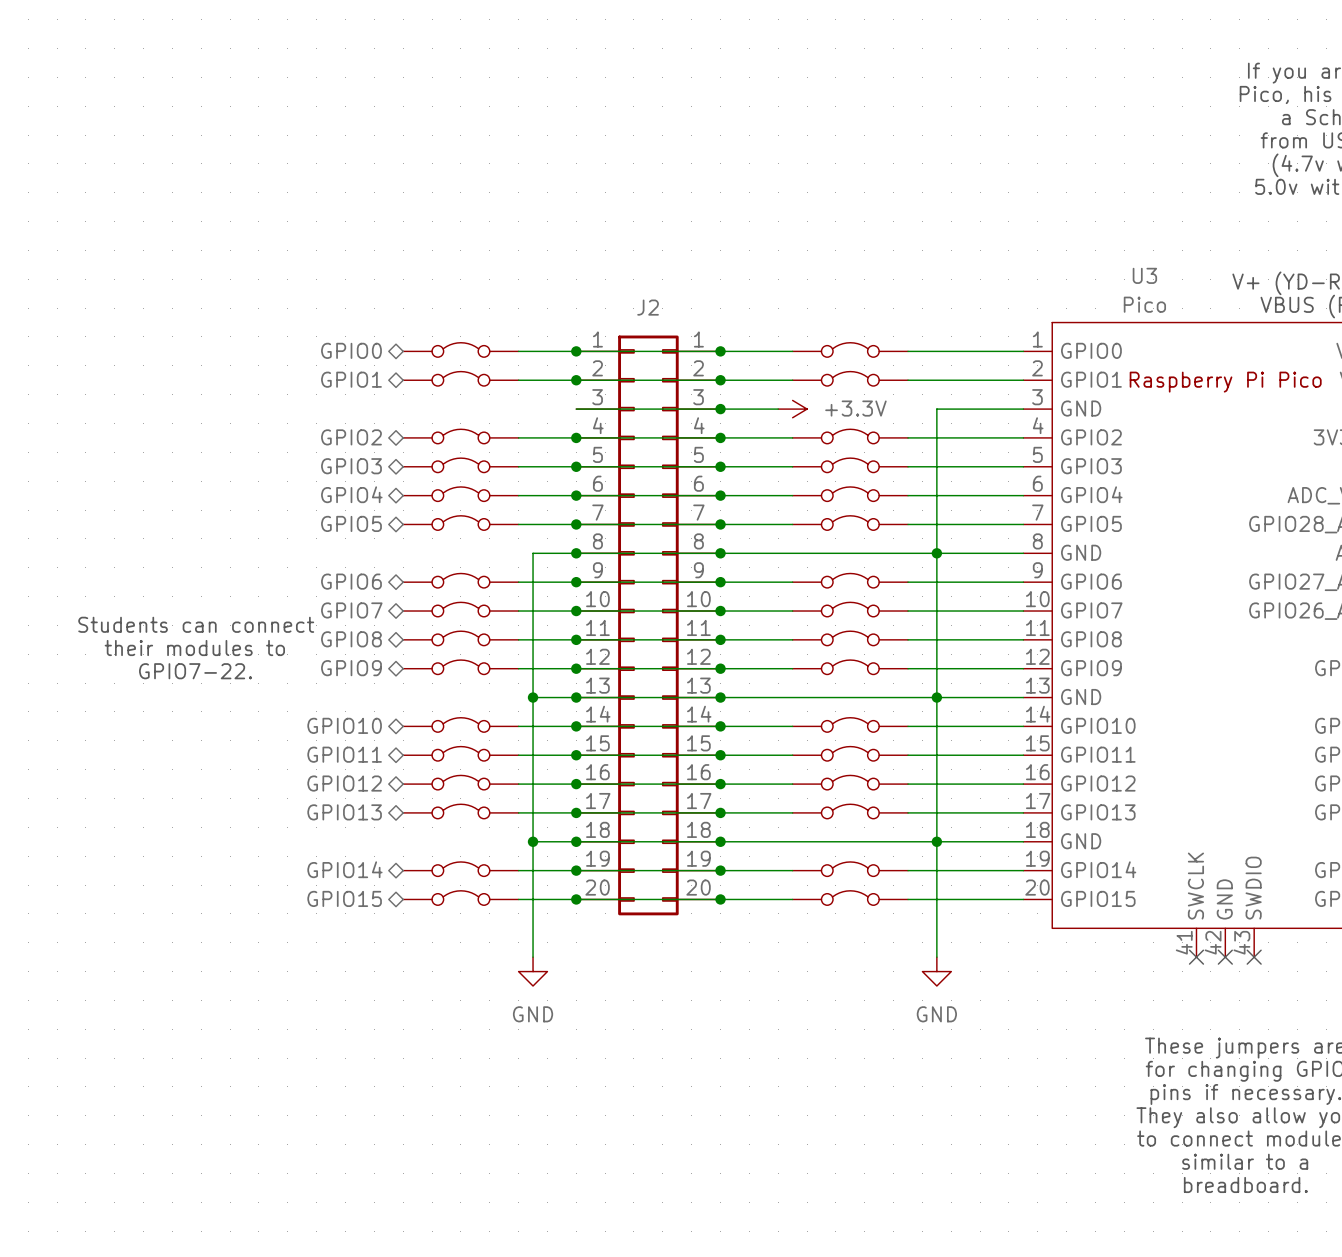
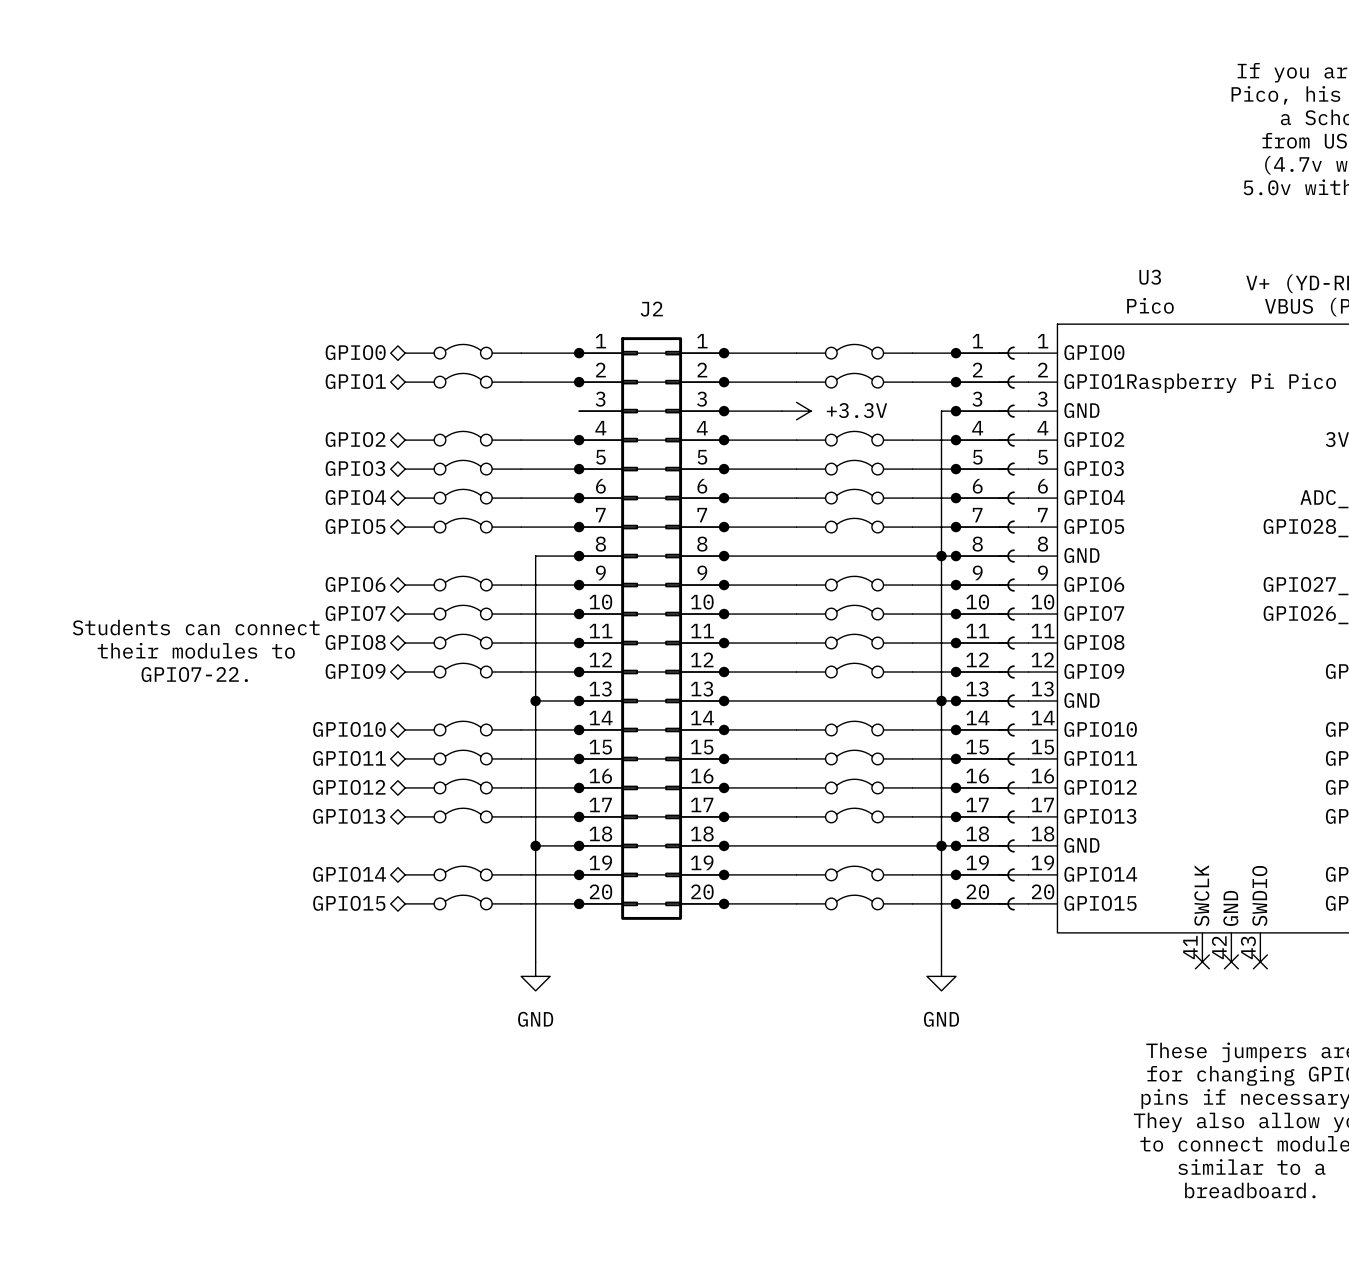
junction: none -> (955, 353)
junction: none -> (955, 382)
junction: none -> (955, 411)
junction: none -> (955, 440)
junction: none -> (955, 469)
junction: none -> (955, 498)
junction: none -> (955, 527)
junction: none -> (955, 556)
junction: none -> (955, 585)
junction: none -> (955, 614)
part: none -> (985, 628)
junction: none -> (955, 643)
junction: none -> (955, 672)
junction: none -> (955, 700)
junction: none -> (955, 729)
junction: none -> (955, 758)
junction: none -> (955, 787)
junction: none -> (955, 816)
junction: none -> (955, 845)
junction: none -> (955, 874)
junction: none -> (955, 903)

